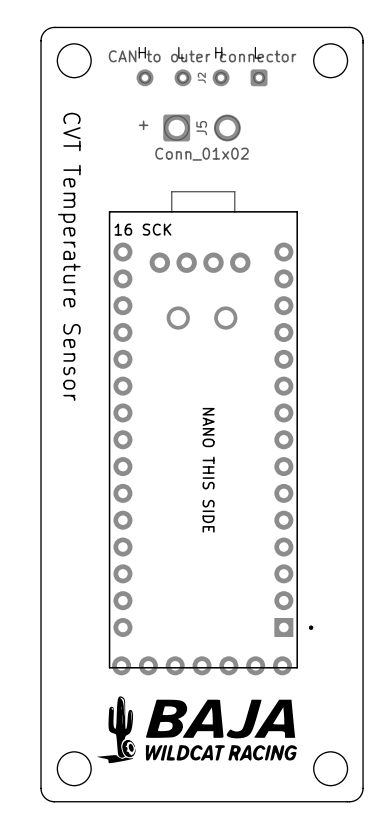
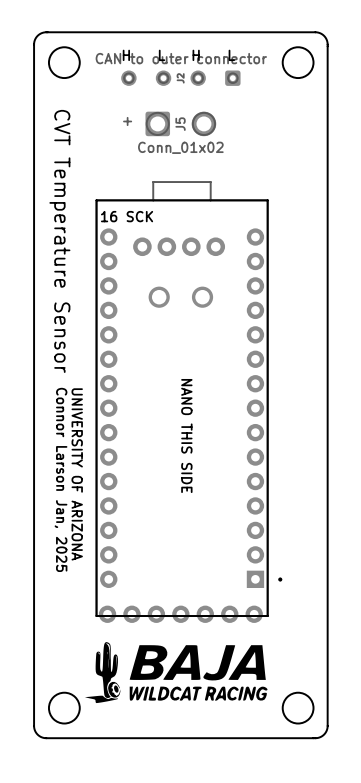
text: none -> UNIVERSITY OF ARIZONA (77, 474)
text: none -> Connor Larson Jan, 2025 (61, 479)

